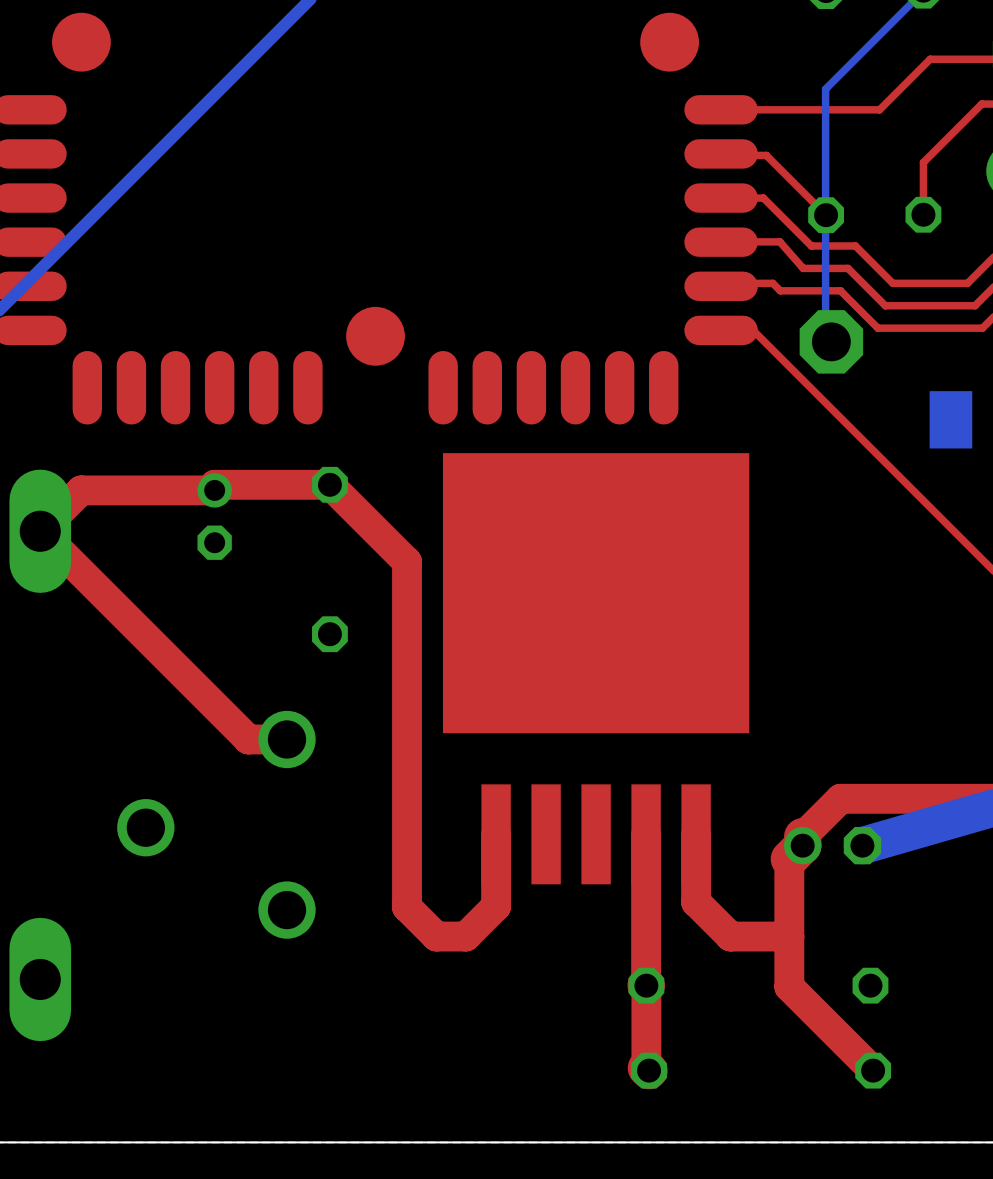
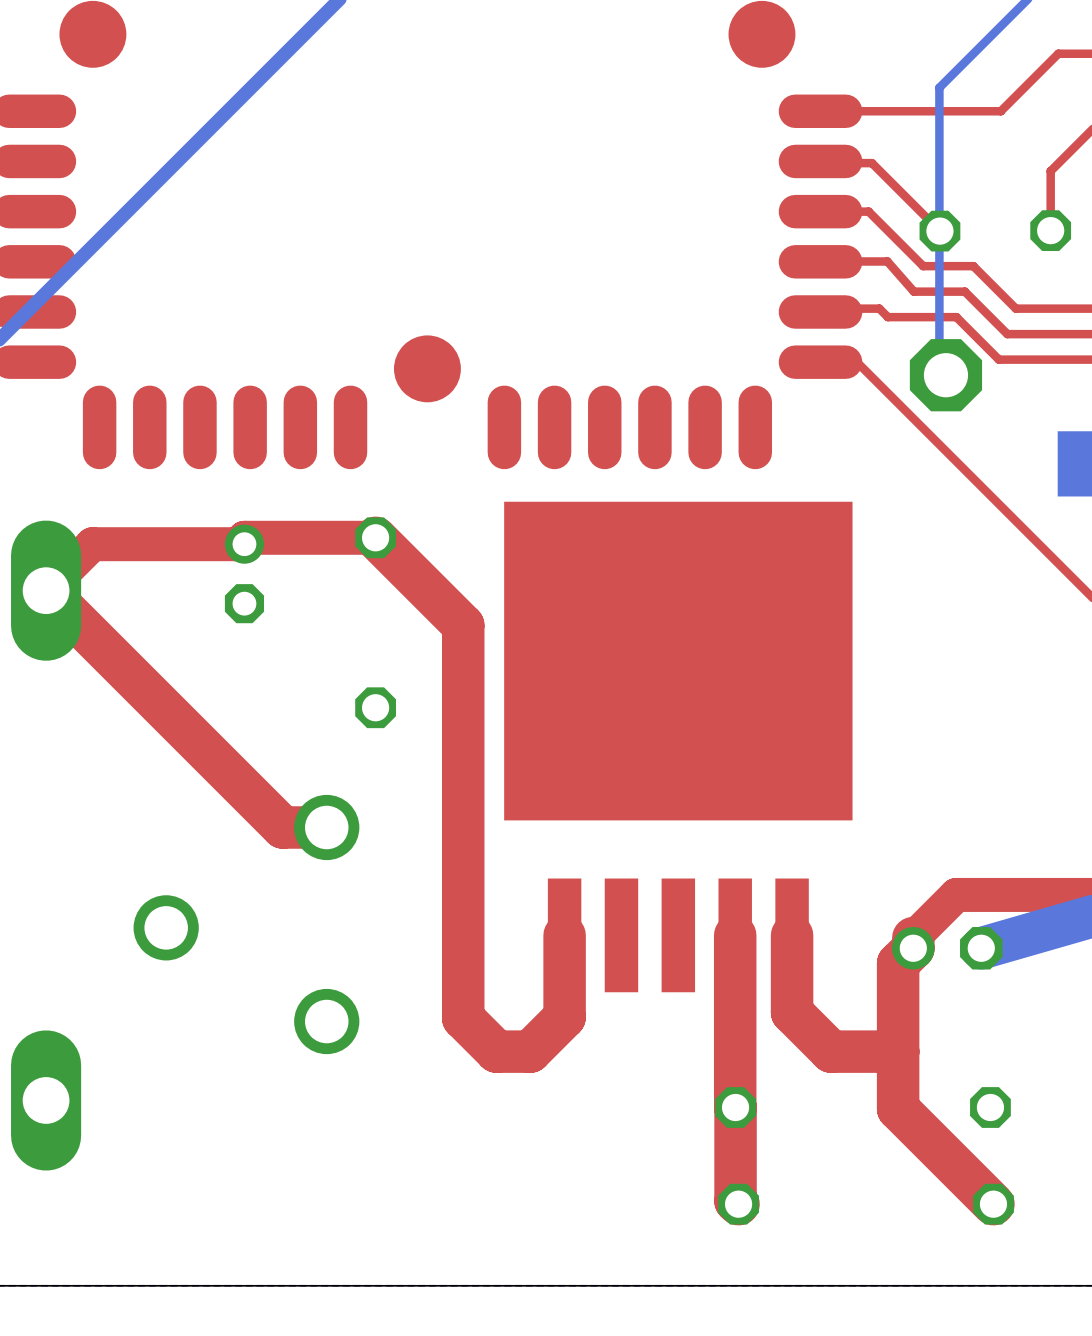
top track width: thin (329, 484) (407, 561) (407, 907) (436, 936) (465, 936) (496, 906) (496, 834) -> thick (375, 537) (463, 625) (463, 1018) (496, 1051) (530, 1051) (564, 1017) (564, 935)
top track width: thin (40, 531) (248, 739) (287, 739) -> thick (46, 590) (282, 827) (326, 827)
top track width: thin (646, 834) (646, 985) -> thick (735, 935) (735, 1107)
top track width: thin (696, 834) (696, 902) (730, 936) (789, 936) -> thick (792, 935) (792, 1012) (831, 1051) (898, 1051)
top track width: thin (789, 859) (789, 986) (873, 1070) -> thick (898, 963) (898, 1108) (993, 1204)
top track width: thin (646, 985) (646, 1068) -> thick (735, 1107) (735, 1201)

